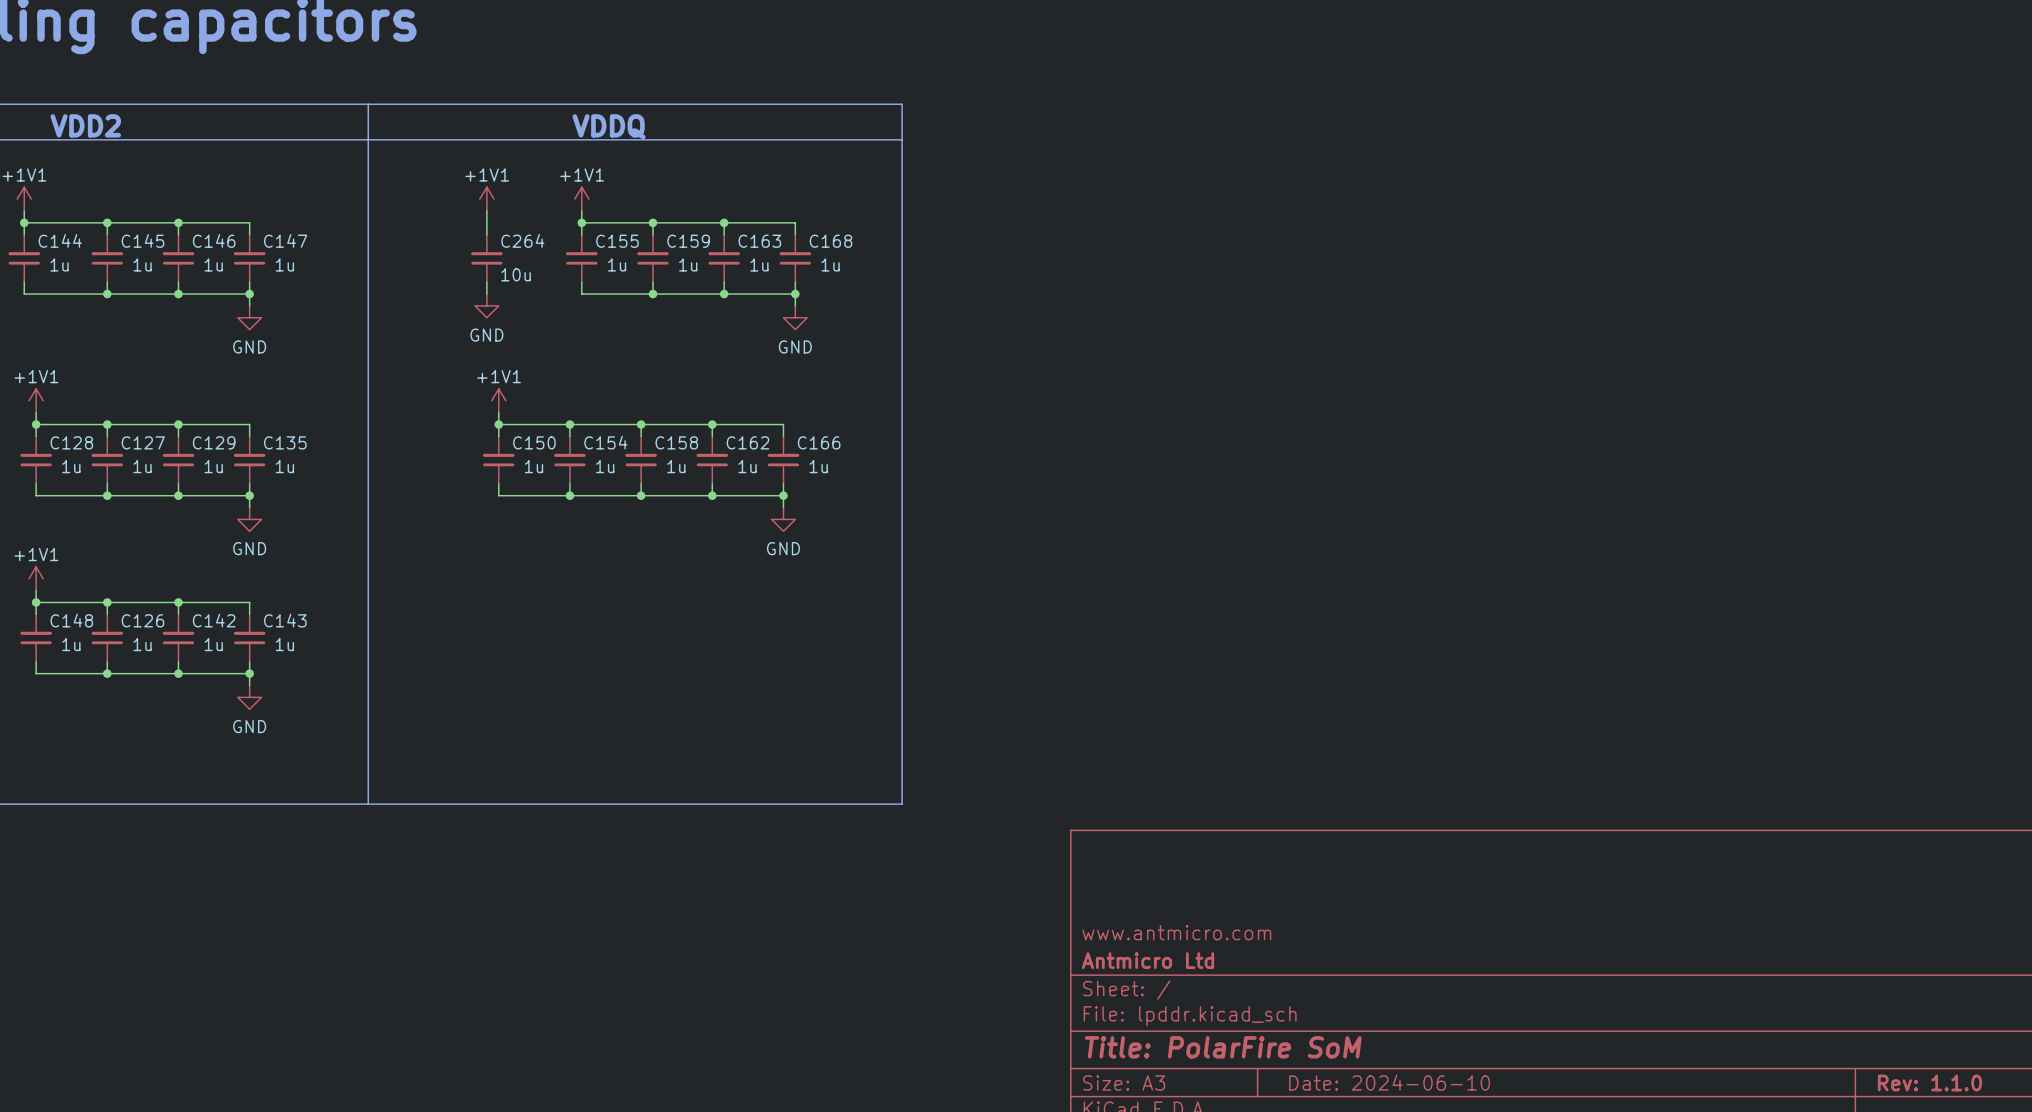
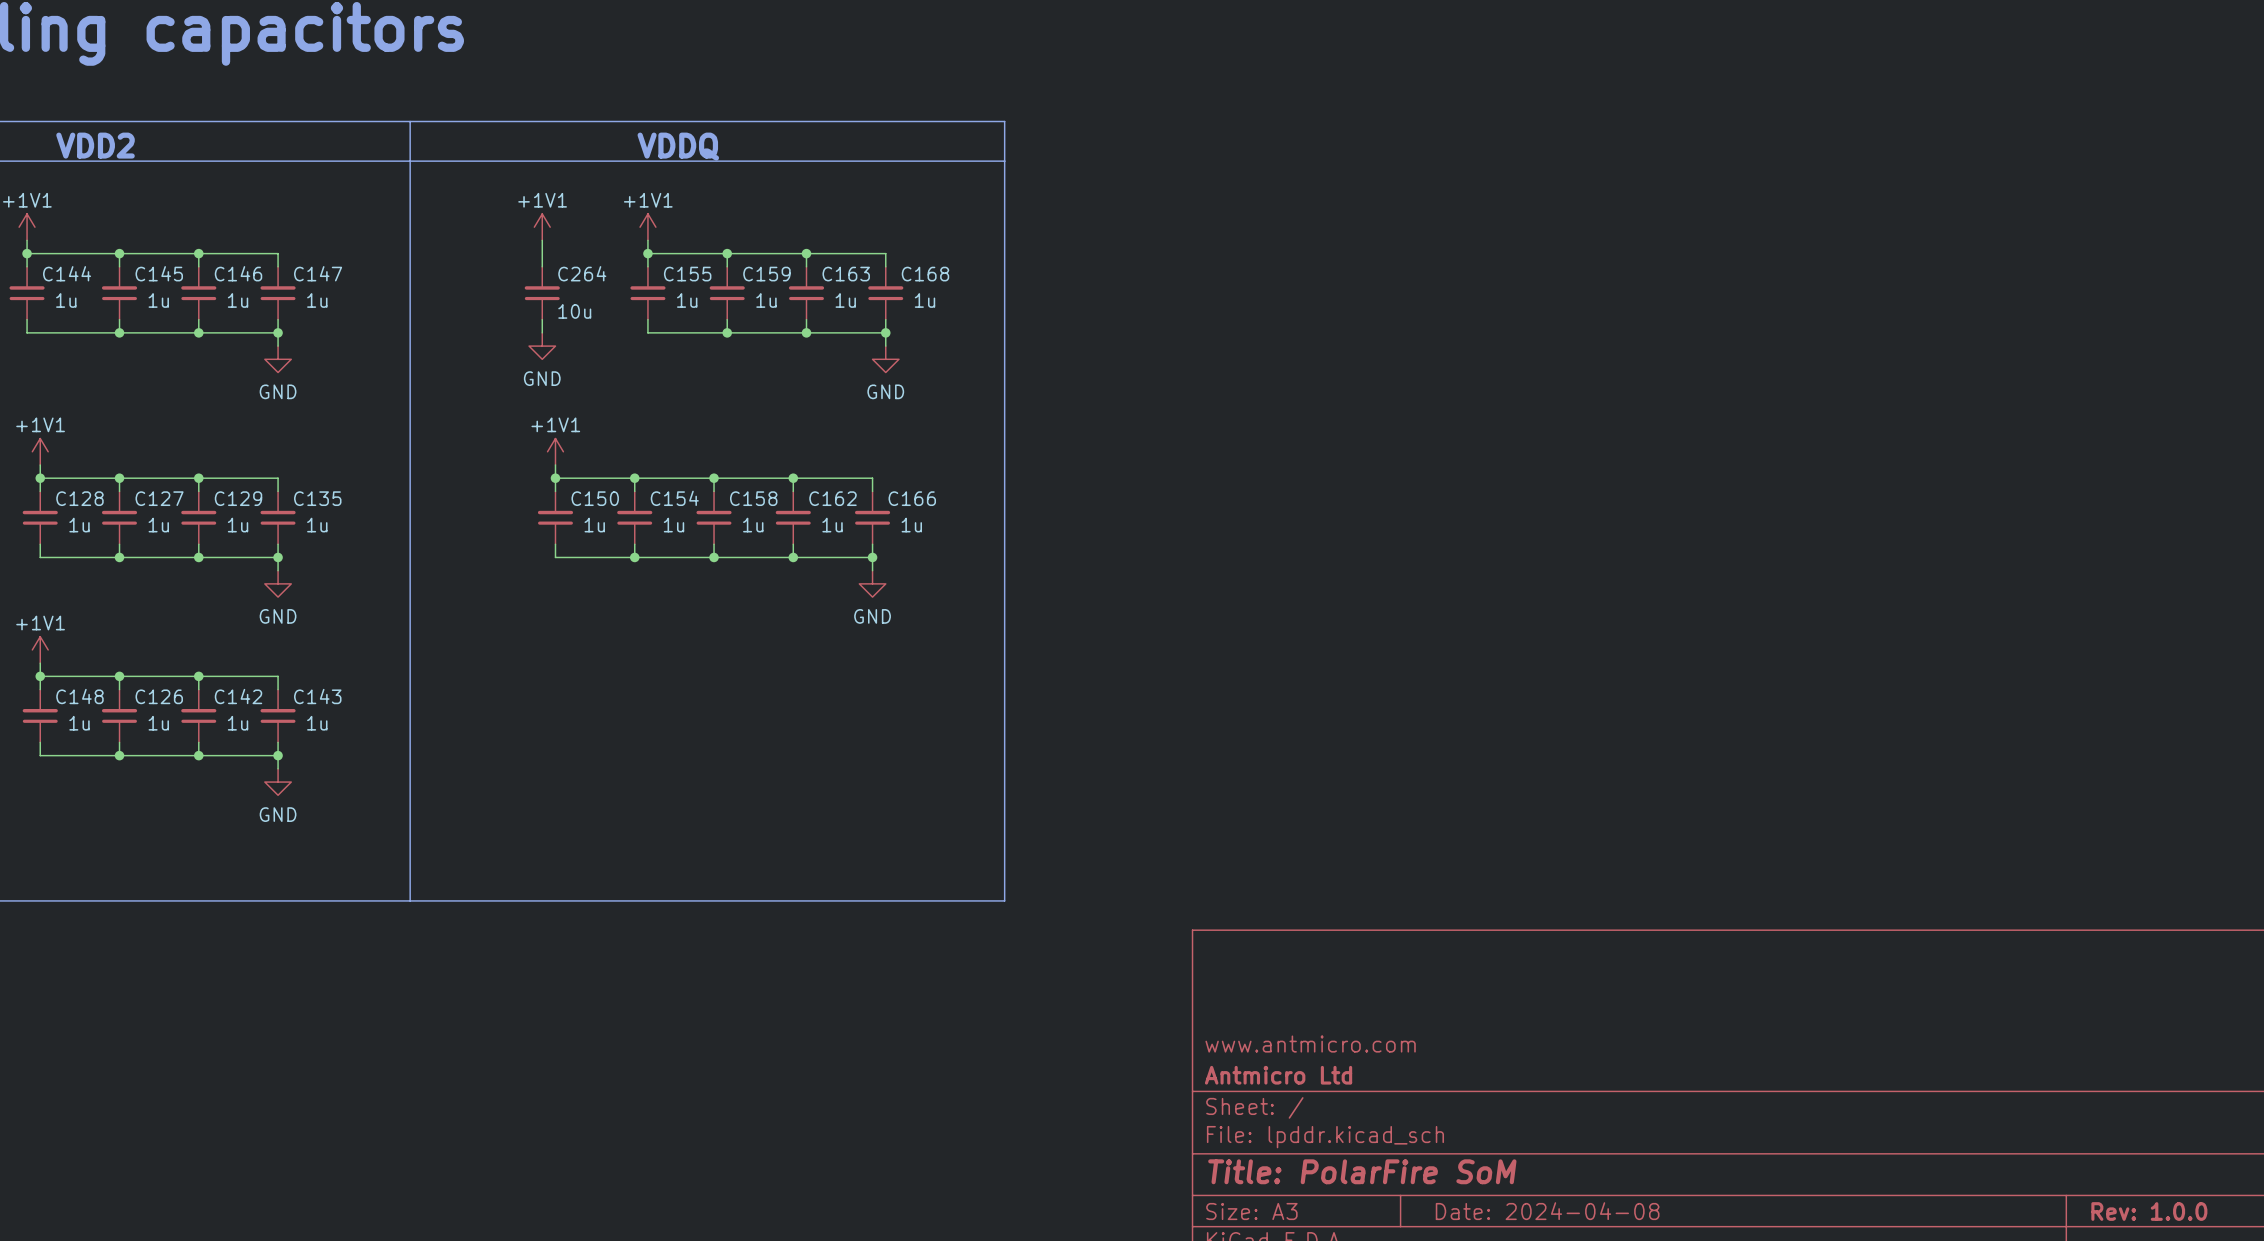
title block: Date: 2024-06-10 (1389, 1082) -> Date: 2024-04-08 (1547, 1211)
title block: Rev: 1.1.0 (1929, 1082) -> Rev: 1.0.0 (2149, 1211)

